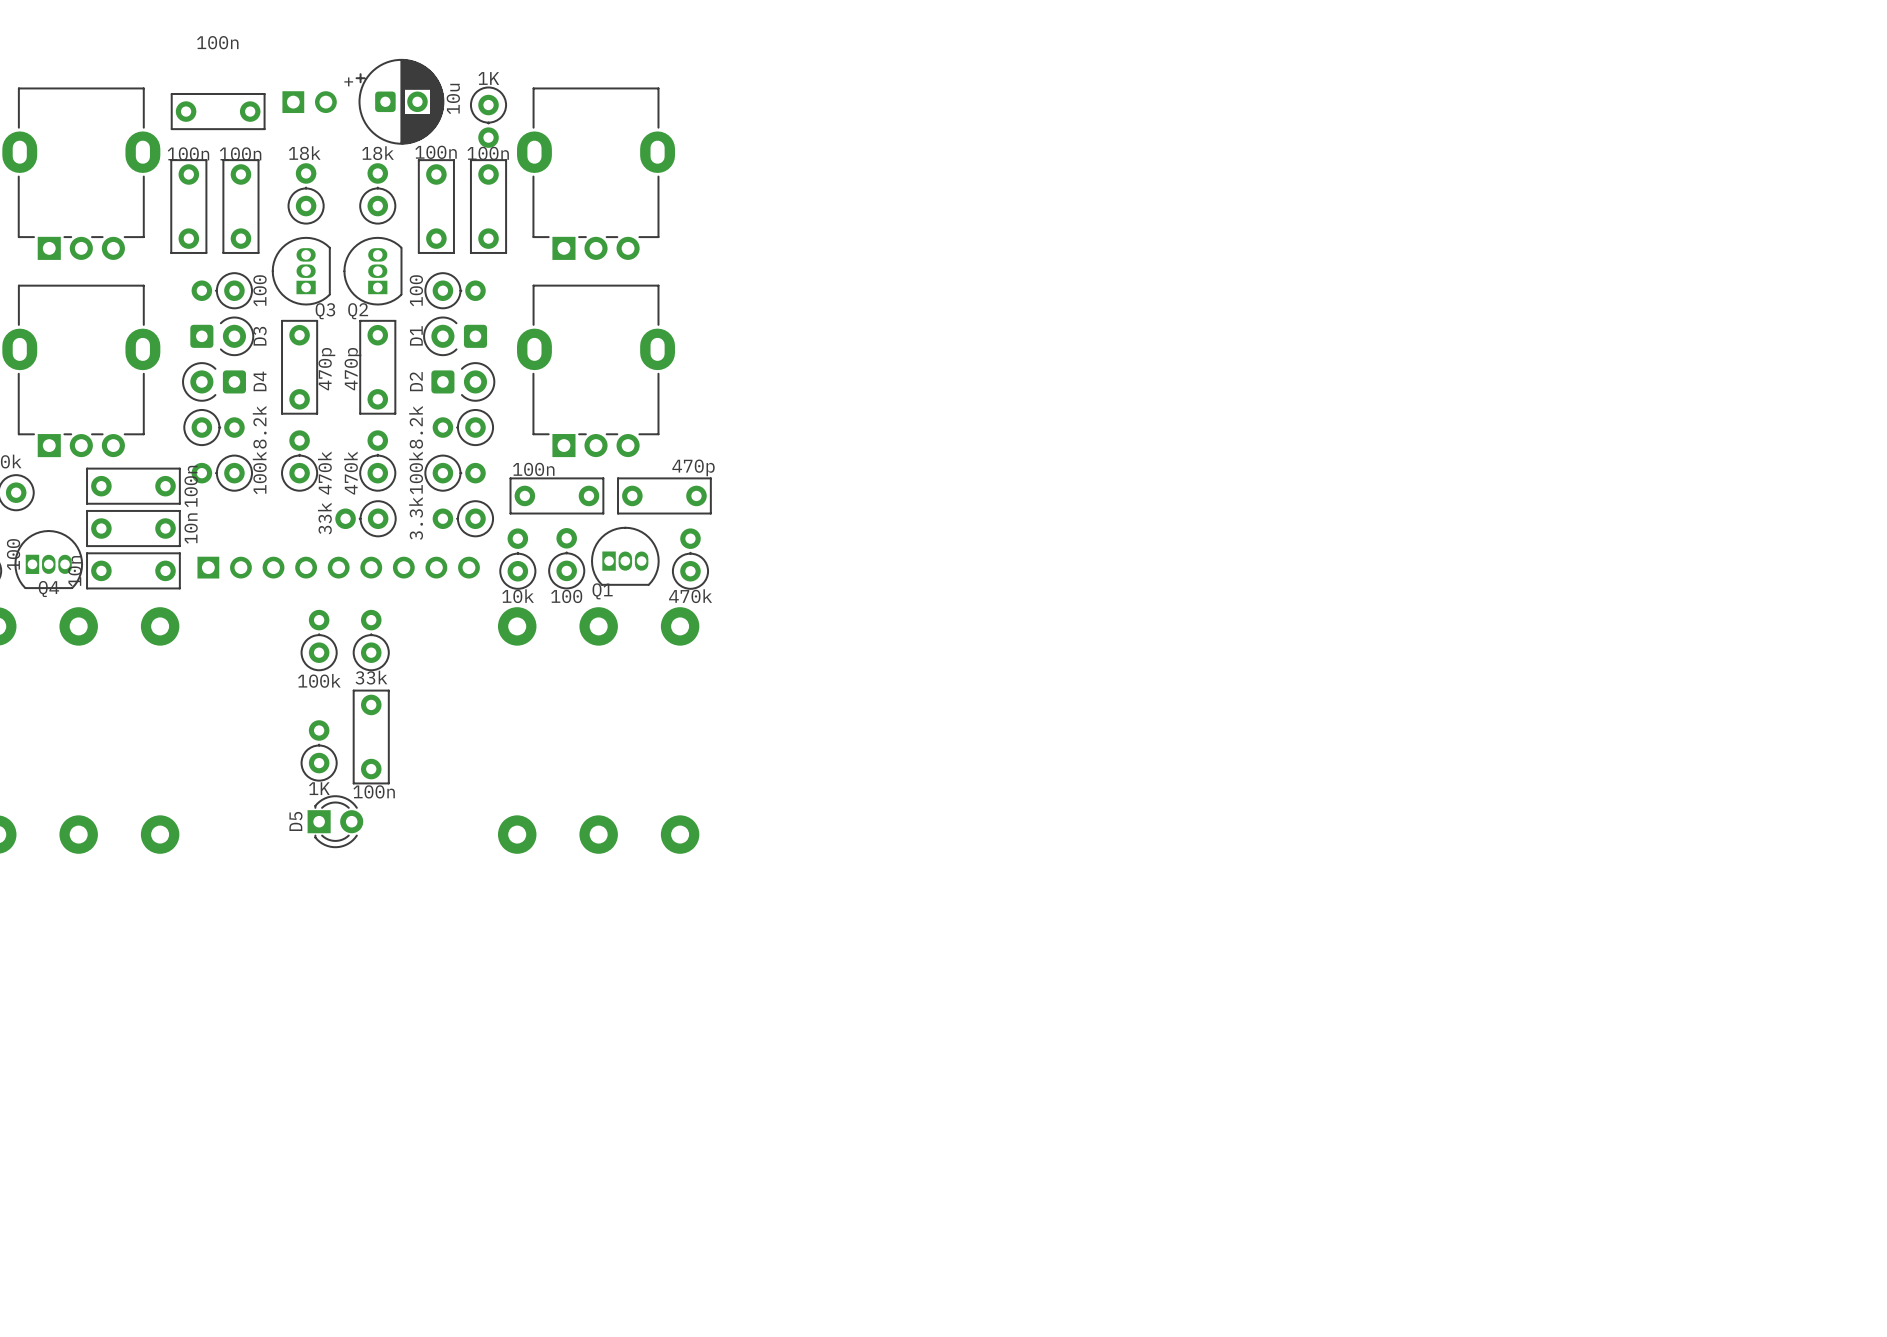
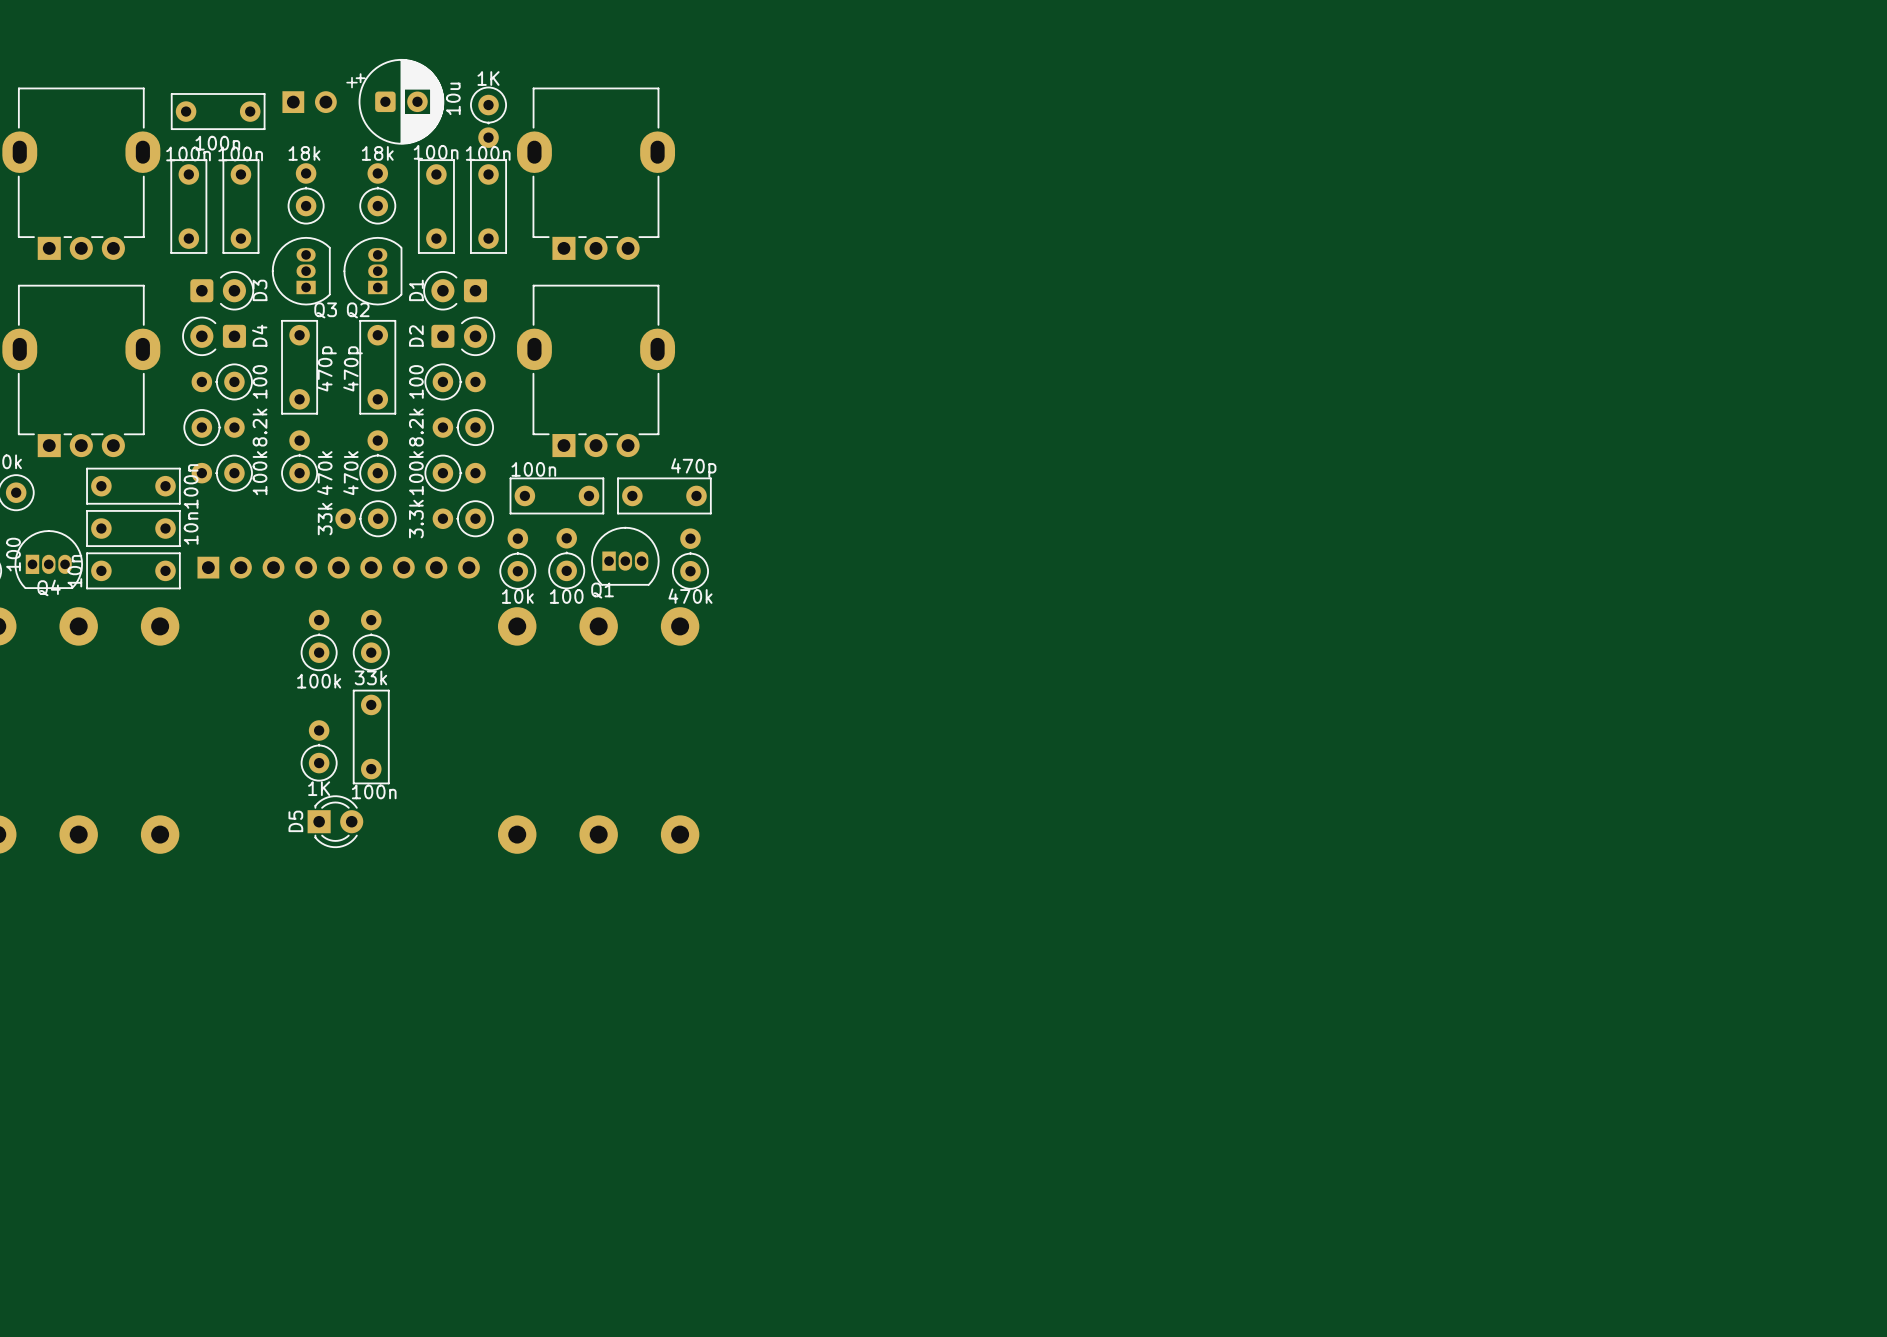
part value position: 100n (217, 42) -> 100n (217, 143)
part position: (222, 290) -> (222, 381)
part position: (455, 290) -> (455, 381)
D3 position: (222, 336) -> (222, 290)
D1 position: (455, 336) -> (455, 290)
D4 position: (214, 381) -> (214, 336)
D2 position: (463, 381) -> (463, 336)

